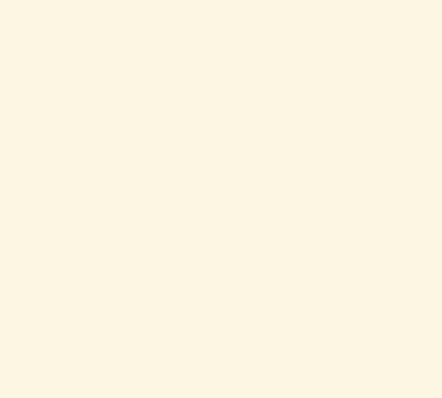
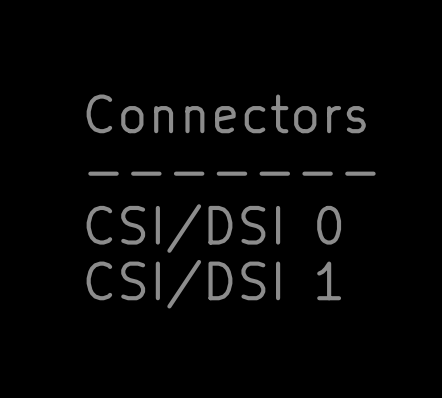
text: none -> Connectors (226, 113)
text: none -> ------- (231, 173)
text: none -> CSI/DSI 0 (213, 228)
text: none -> CSI/DSI 1 (213, 284)

